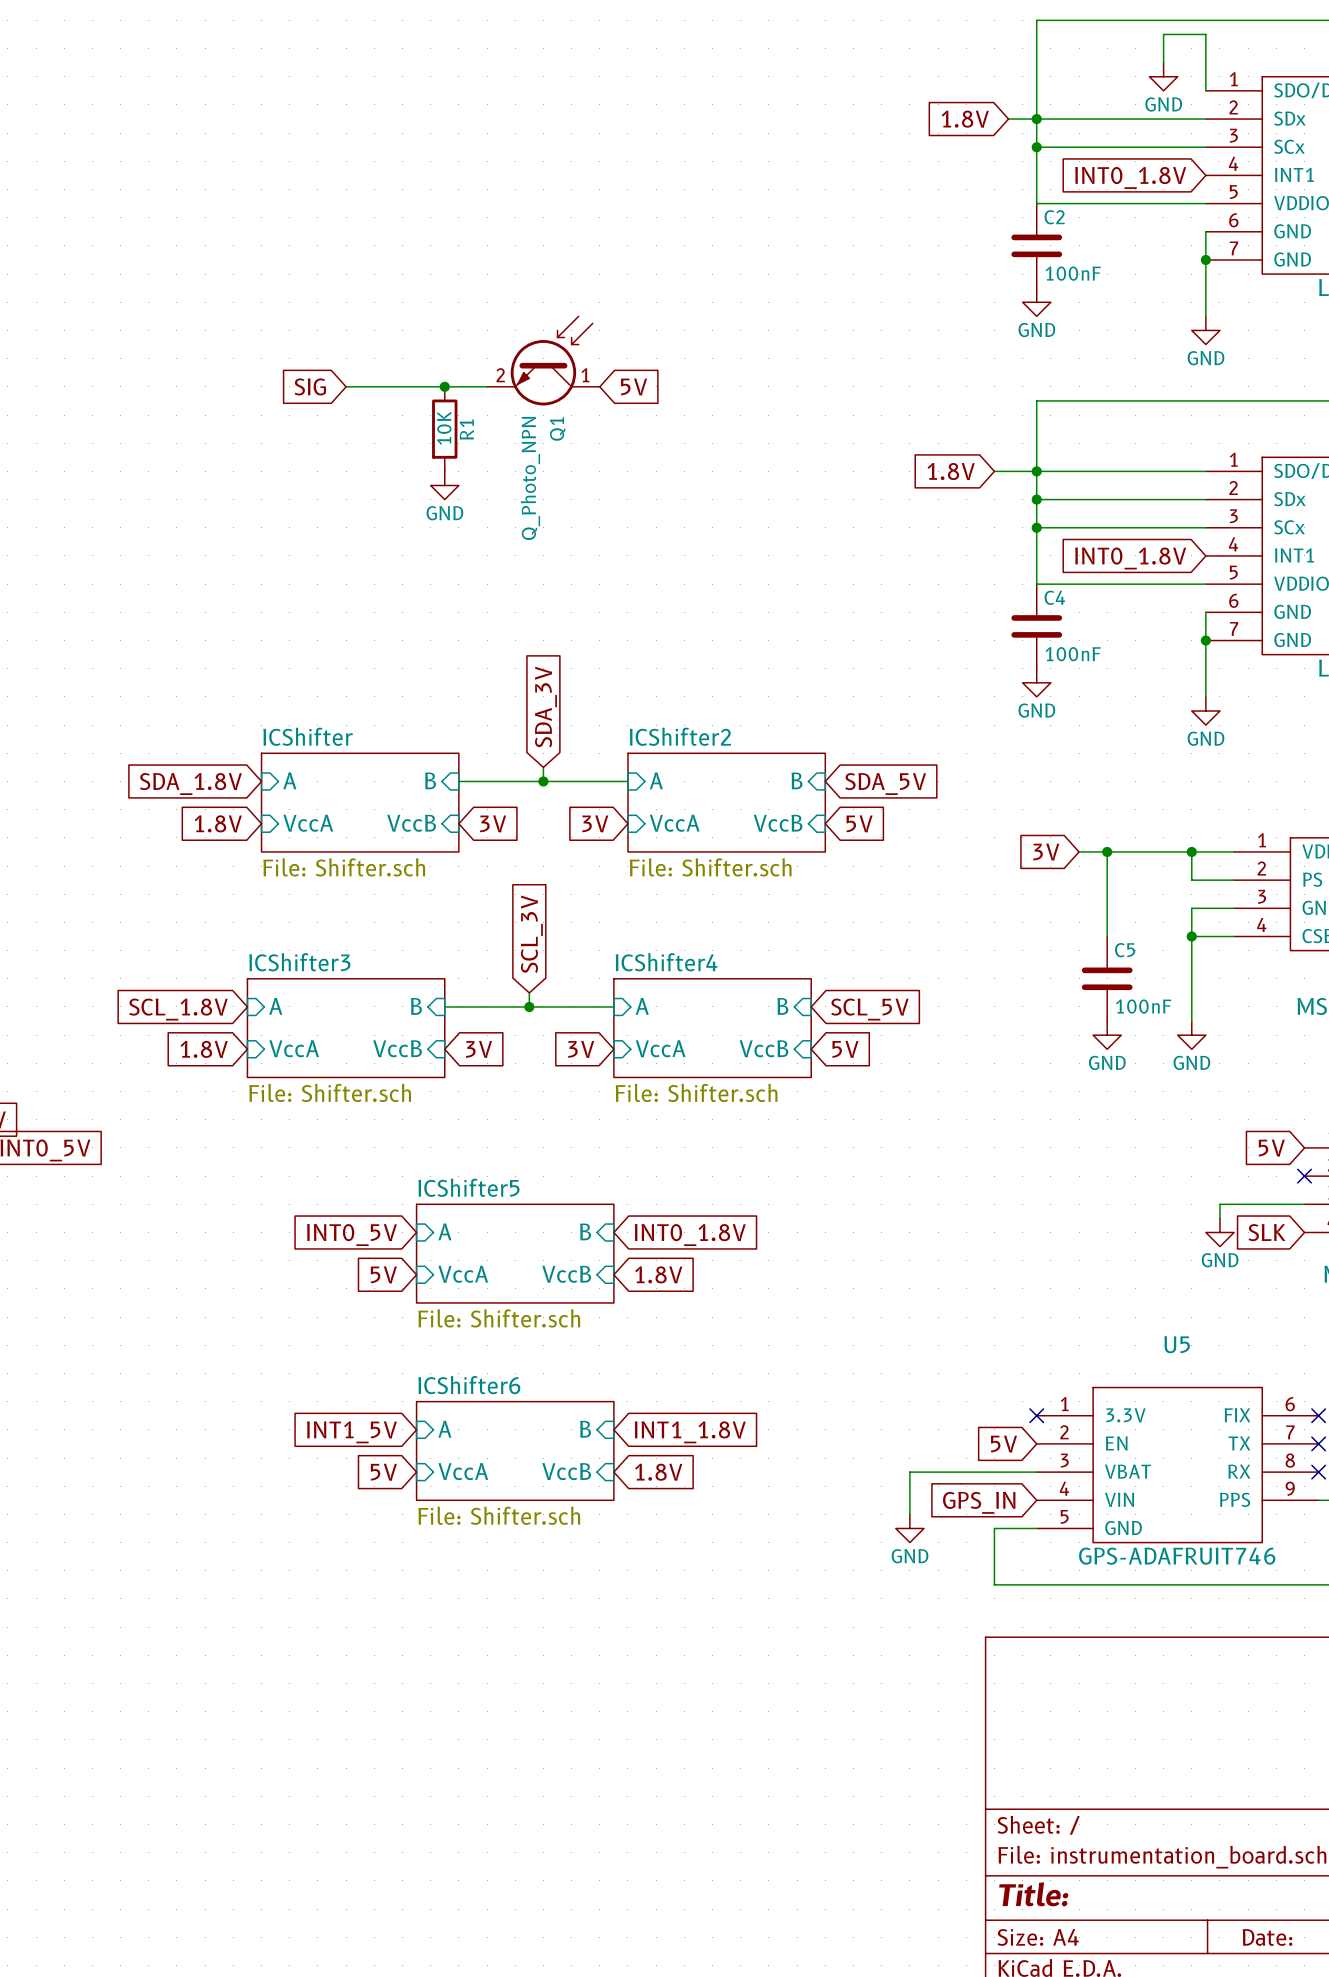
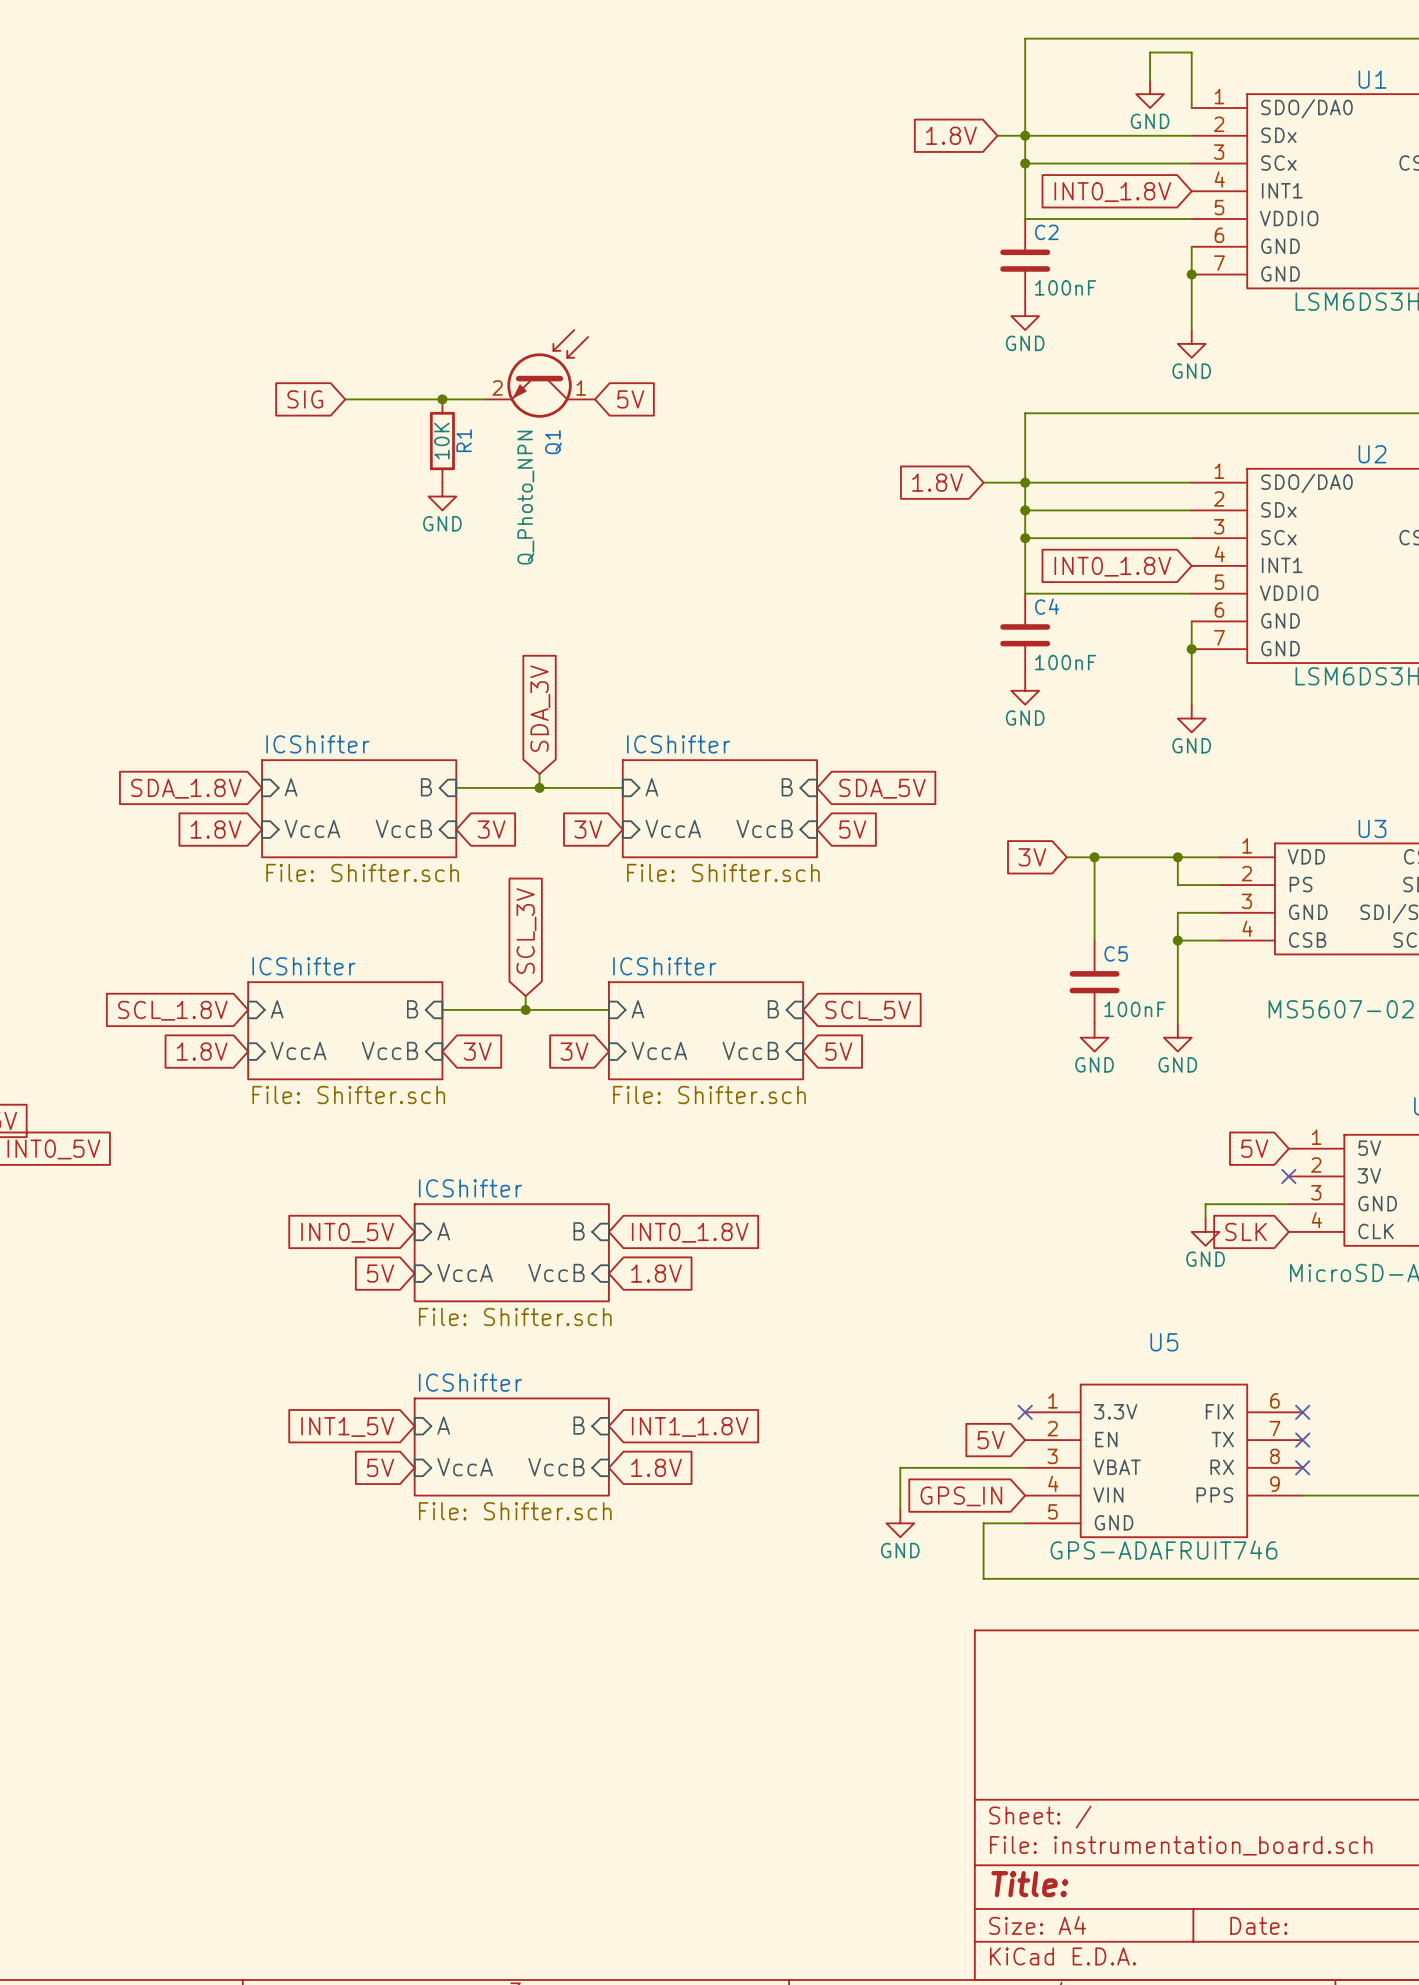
sheet ICShifter2 name: ICShifter2 (680, 736) -> ICShifter (678, 744)
sheet ICShifter3 name: ICShifter3 (299, 962) -> ICShifter (303, 966)
sheet ICShifter4 name: ICShifter4 (666, 962) -> ICShifter (664, 966)
sheet ICShifter5 name: ICShifter5 (468, 1187) -> ICShifter (470, 1188)
sheet ICShifter6 name: ICShifter6 (469, 1385) -> ICShifter (470, 1382)

